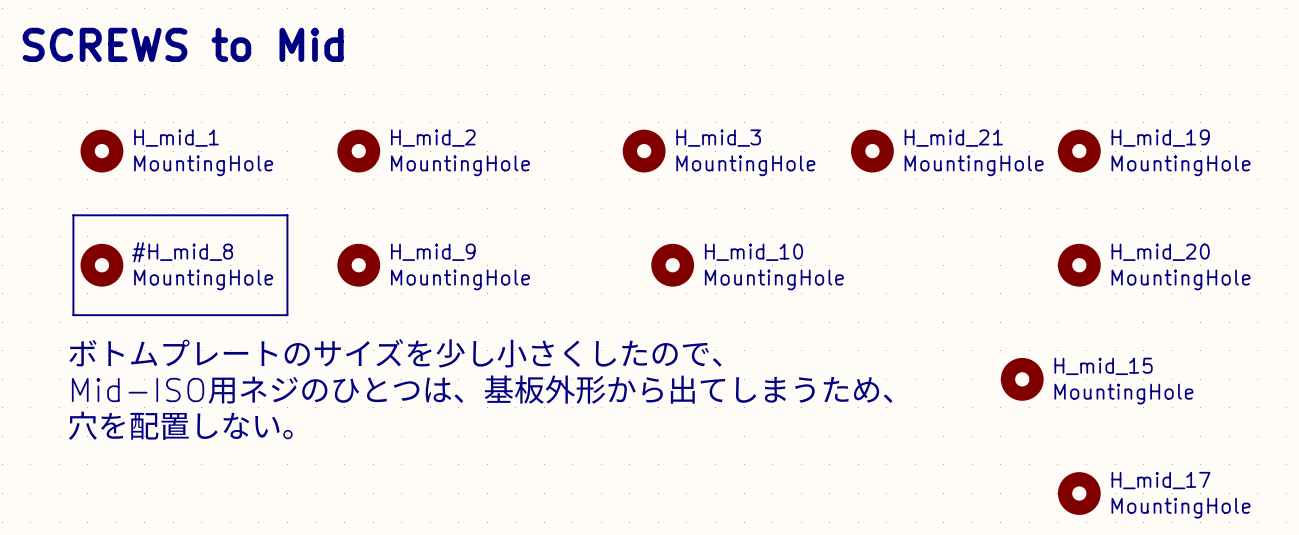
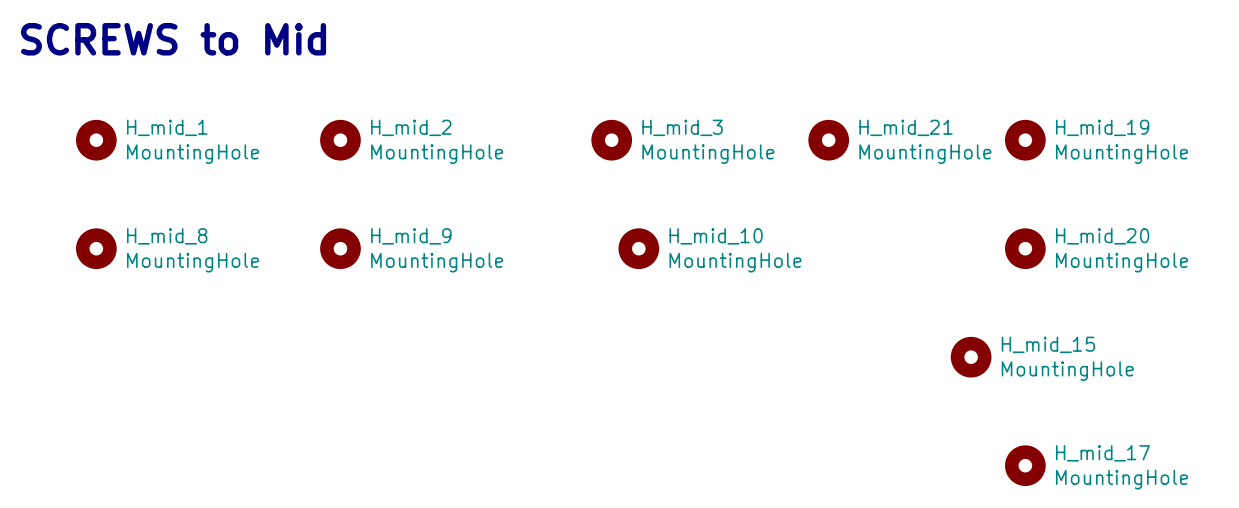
line: (73, 215) (287, 215) (287, 315) (73, 315) (73, 215) -> none
#H_mid_8: MountingHole (101, 265) -> none
H_mid_8: none -> MountingHole (96, 248)
text: ボトムプレートのサイズを少し小さくしたので、 (395, 353) -> none
text: Mid-ISO用ネジのひとつは、基板外形から出てしまうため、 (482, 389) -> none
text: 穴を配置しない。 (180, 425) -> none

